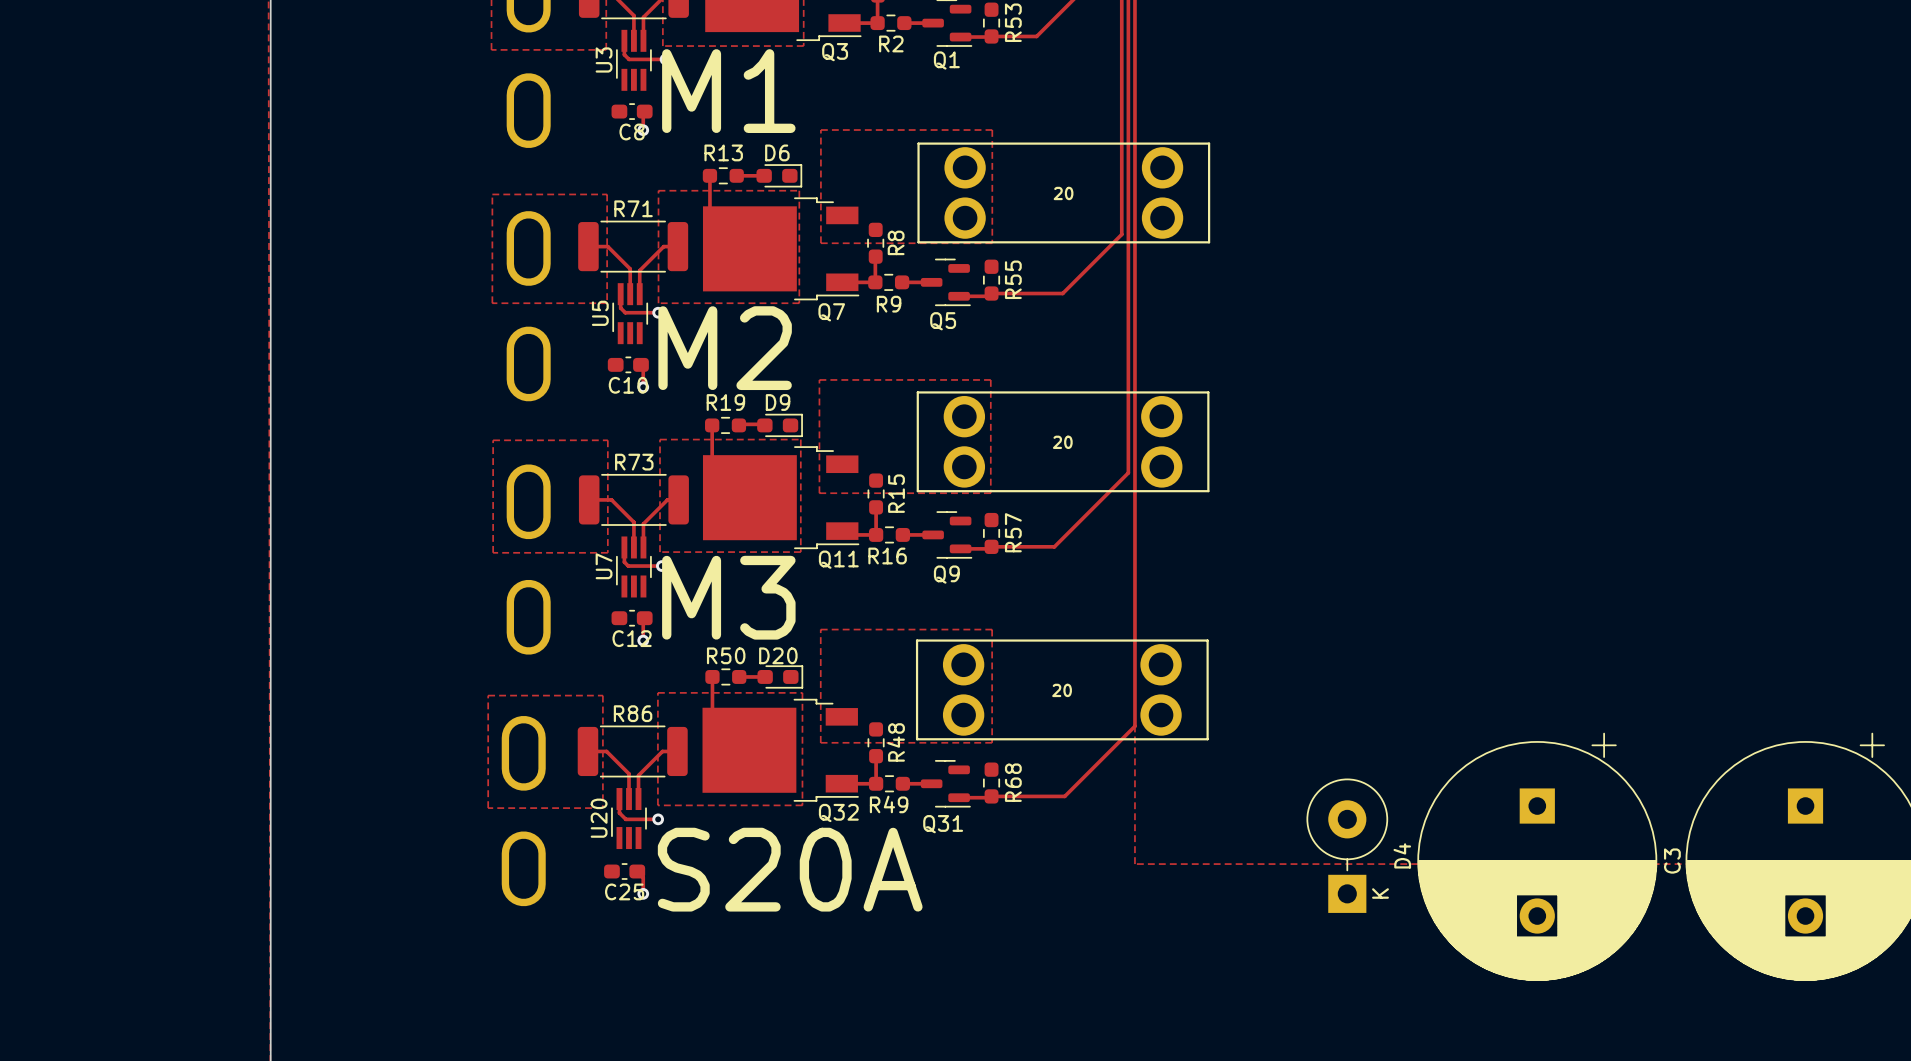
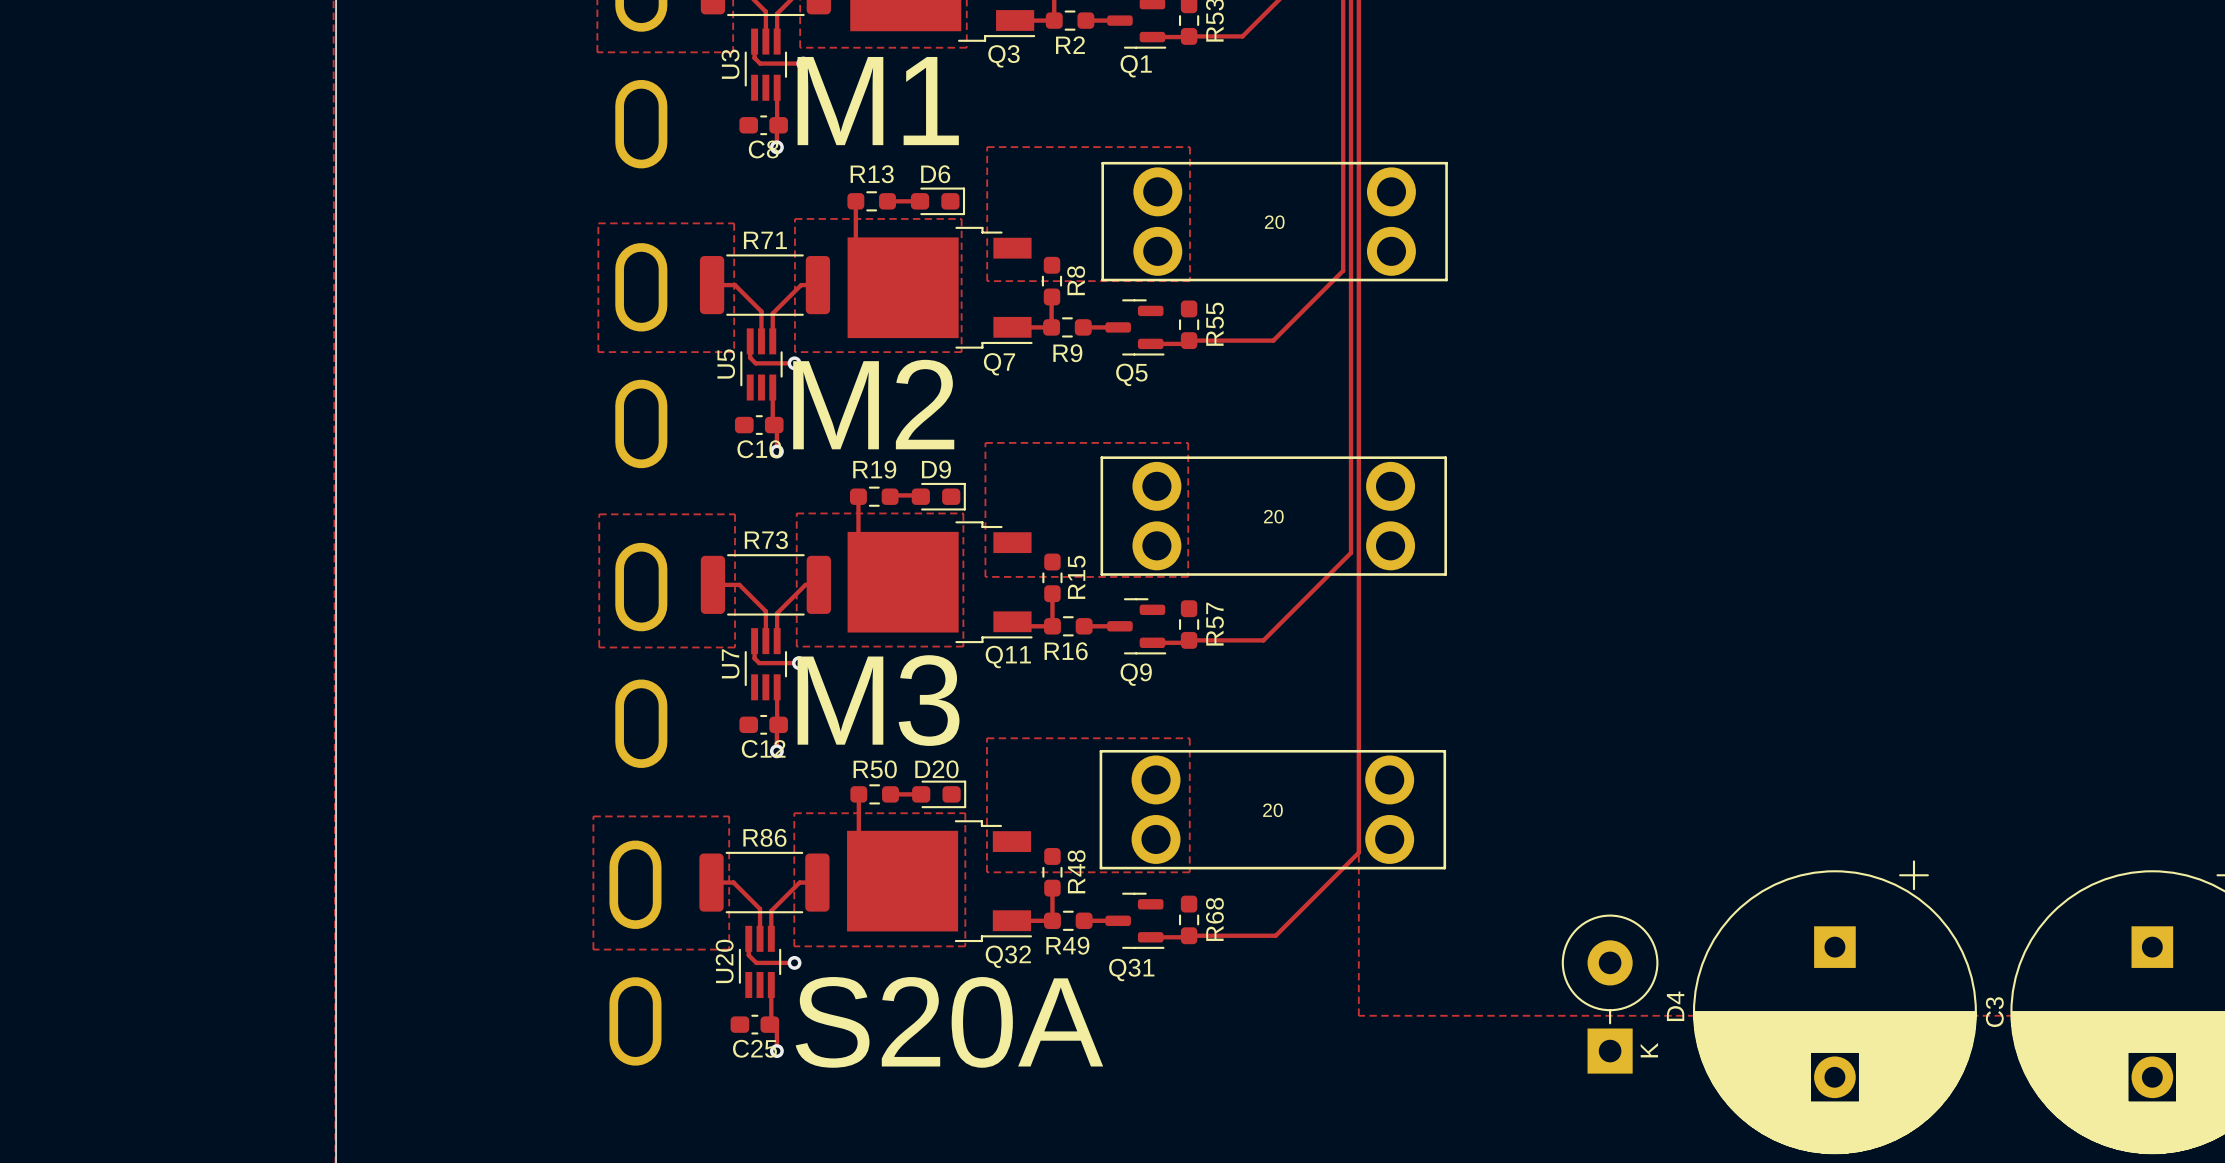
track: none -> (777, 87) (778, 125)
track: none -> (772, 387) (774, 425)
track: none -> (777, 687) (778, 724)
track: none -> (771, 984) (769, 1024)

